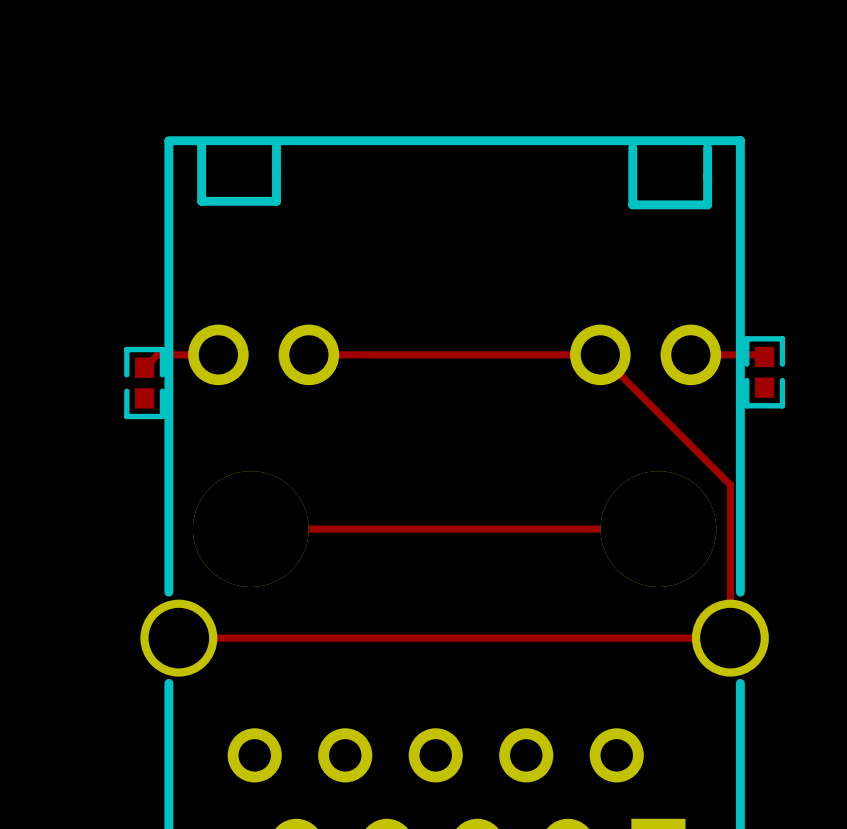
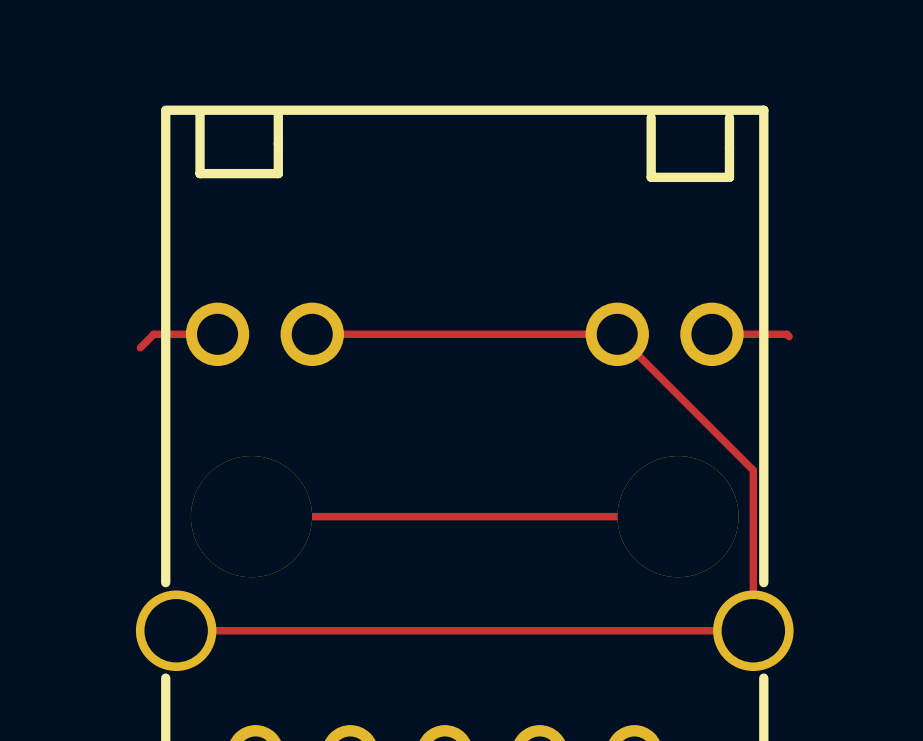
part: (764, 372) -> none
part: (144, 383) -> none

